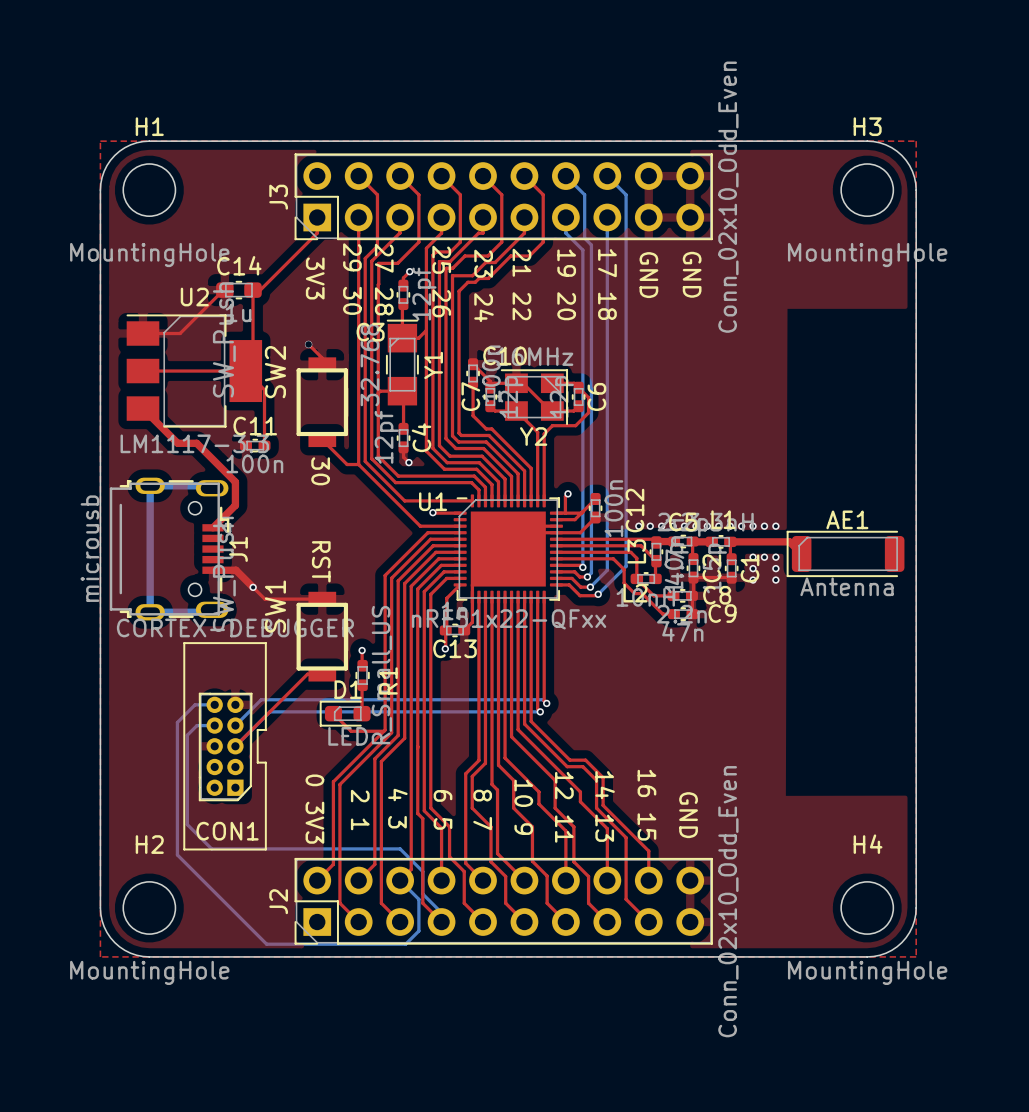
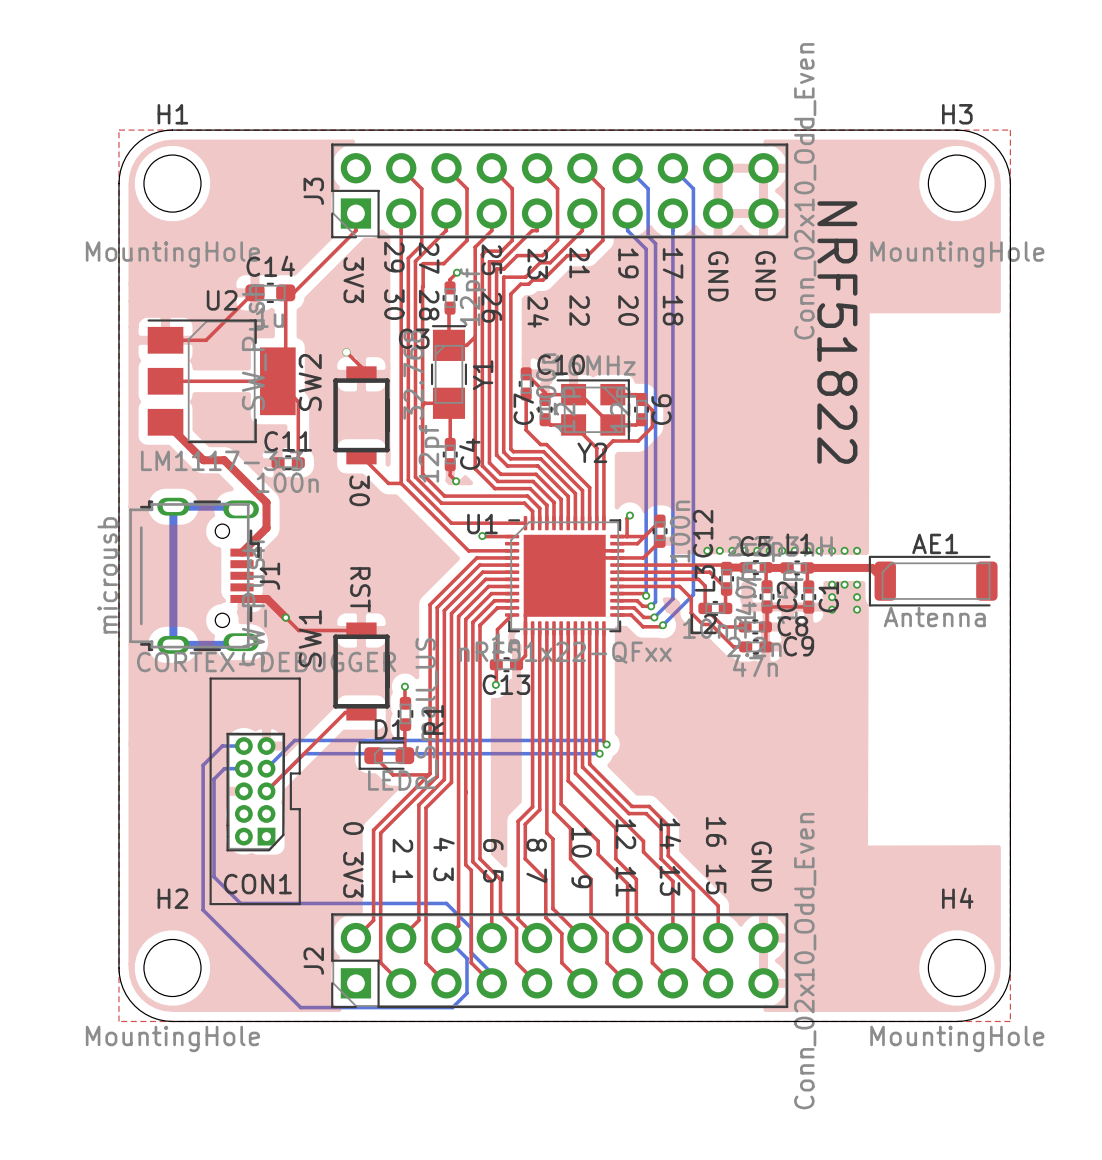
text: none -> NRF51822 (837, 332)

